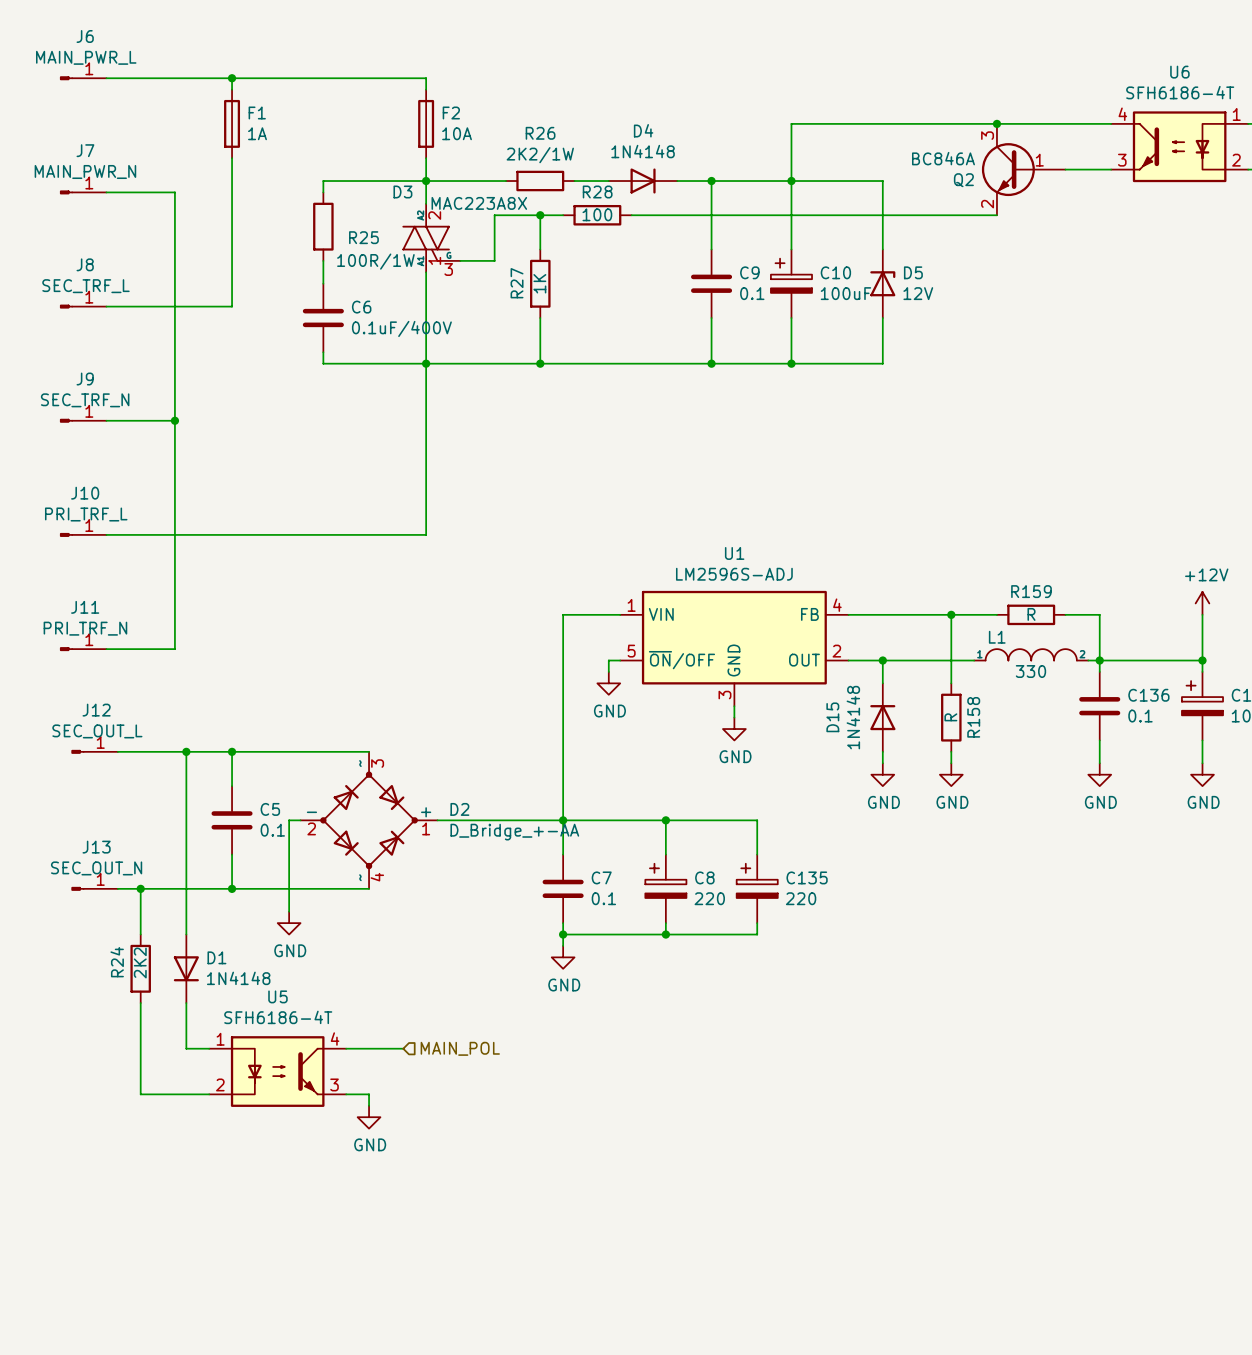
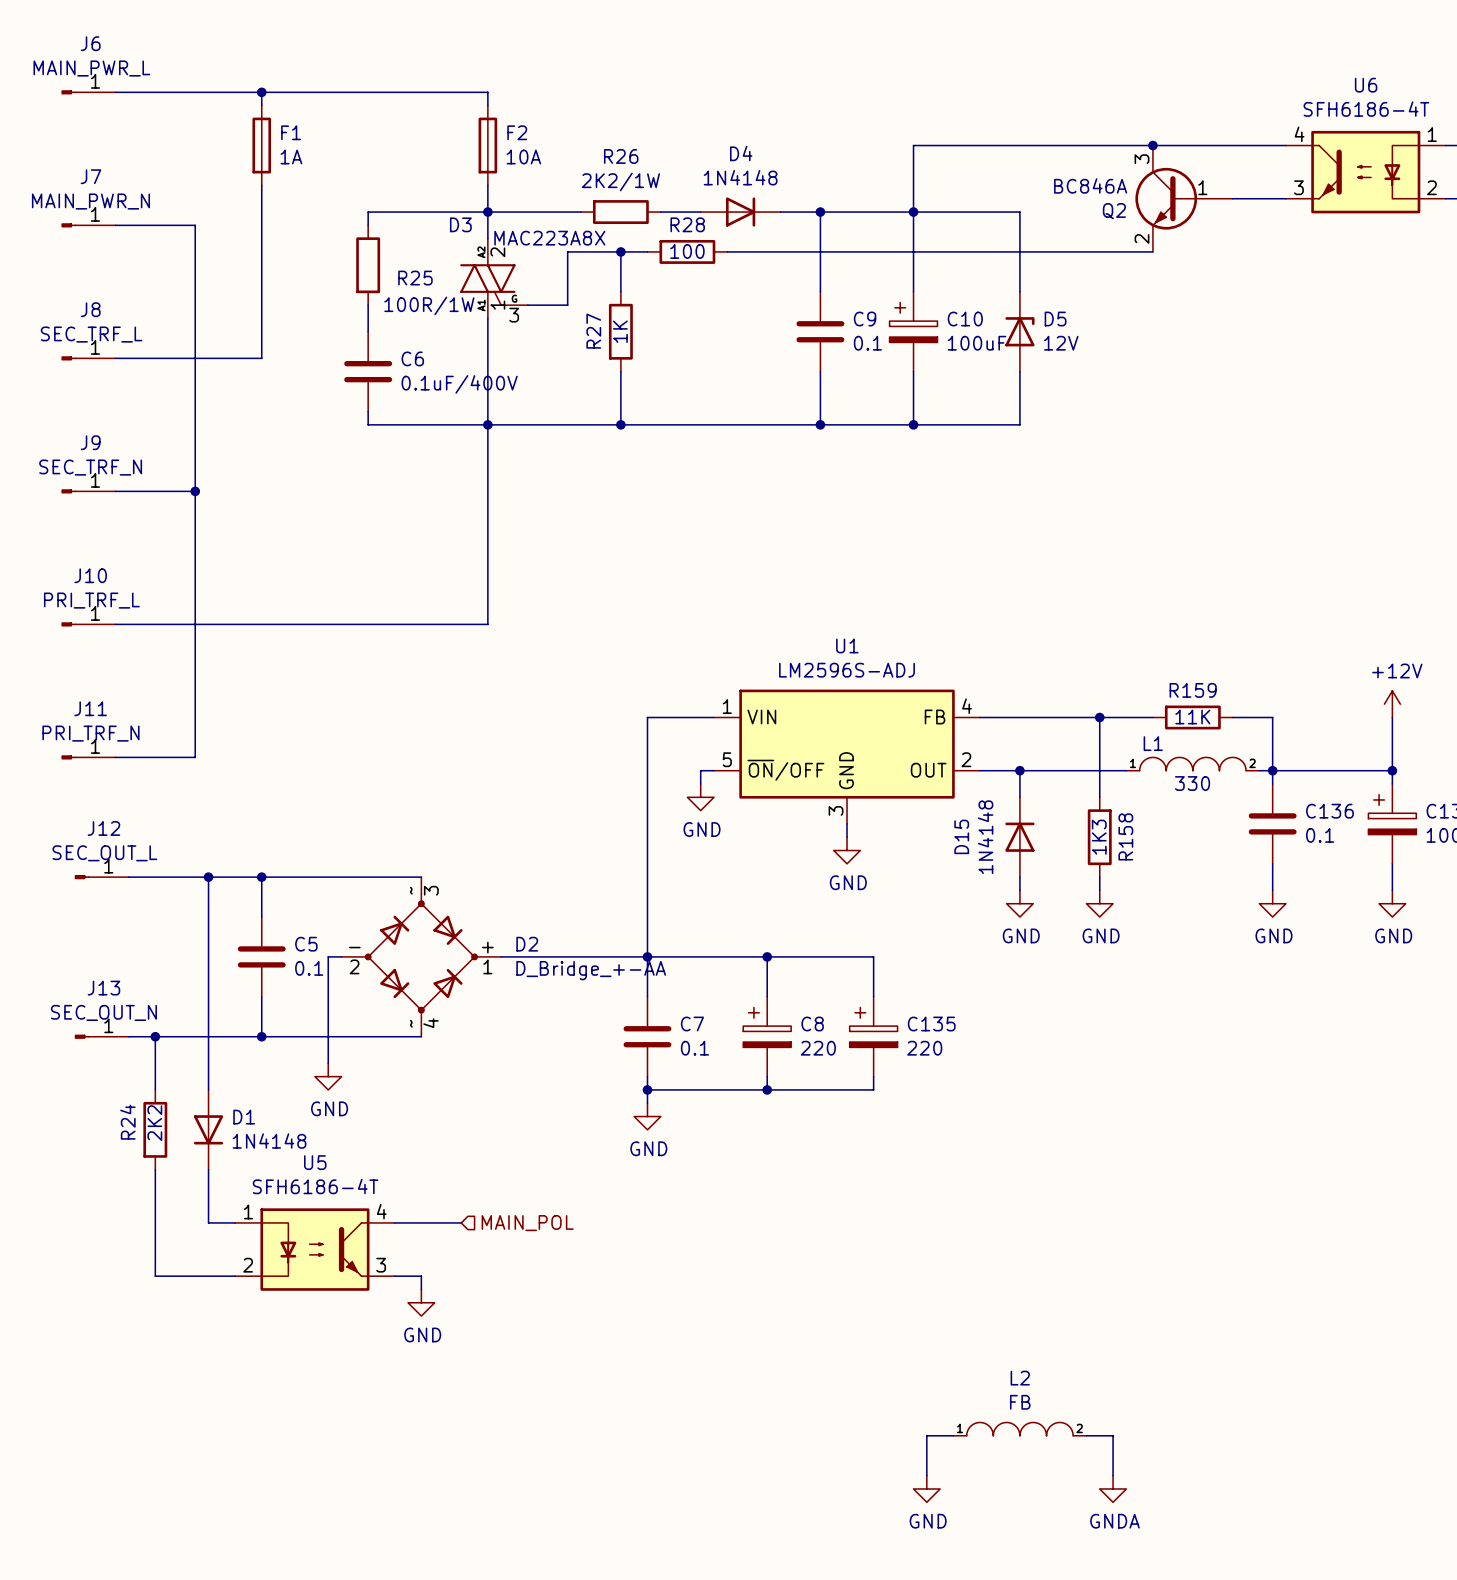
R159 value: R (1031, 614) -> 11K (1192, 717)
R158 value: R (950, 717) -> 1K3 (1099, 837)
L2: none -> FB (1019, 1429)
wire: none -> (953, 1435) (926, 1435) (926, 1475)
wire: none -> (1086, 1435) (1113, 1435) (1113, 1475)
power symbol: none -> GND (926, 1488)
power symbol: none -> GNDA (1113, 1488)

